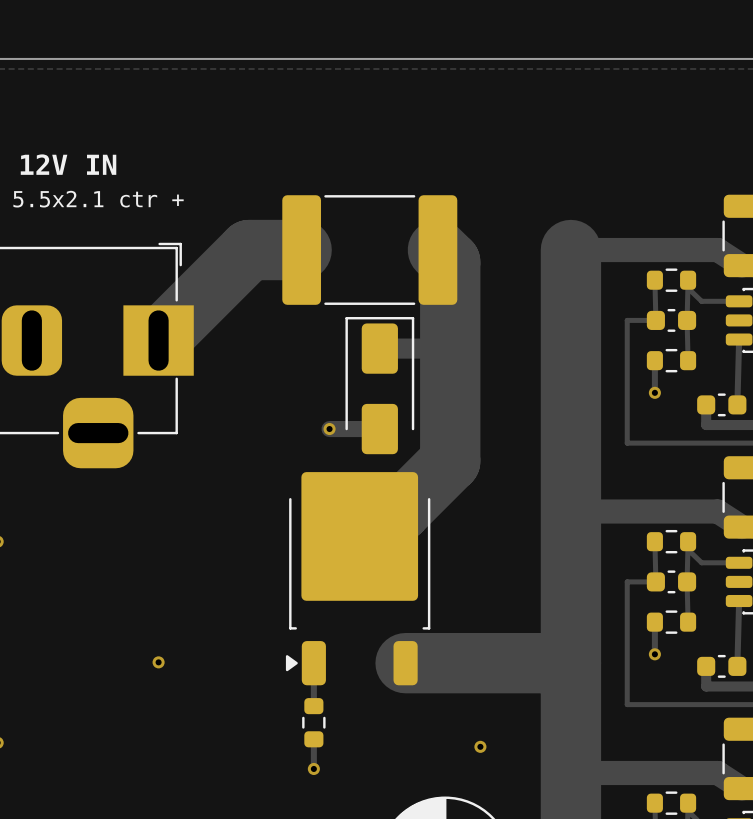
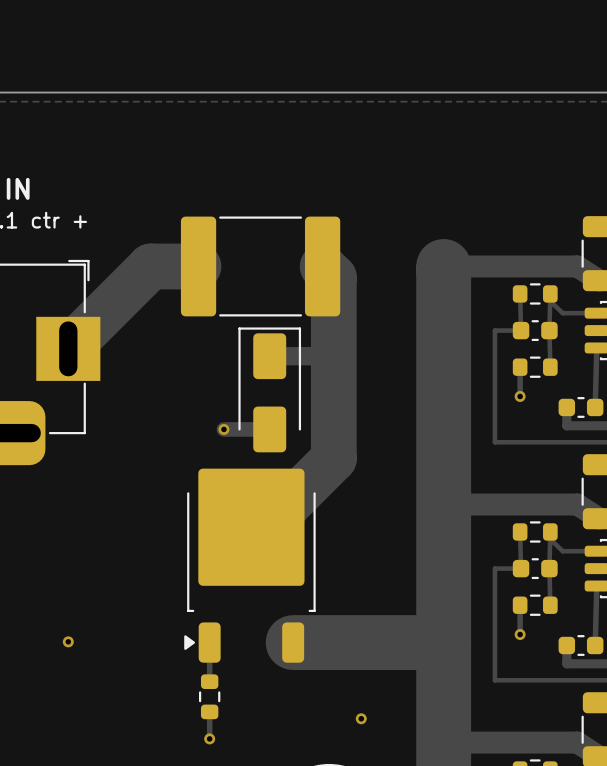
track width: thick (301, 250) (249, 250) (158, 340) -> thin (198, 266) (150, 266) (68, 348)
track width: thick (437, 250) (450, 262) (450, 461) (399, 511) (359, 535) -> thin (322, 266) (333, 277) (333, 458) (288, 504) (251, 526)

